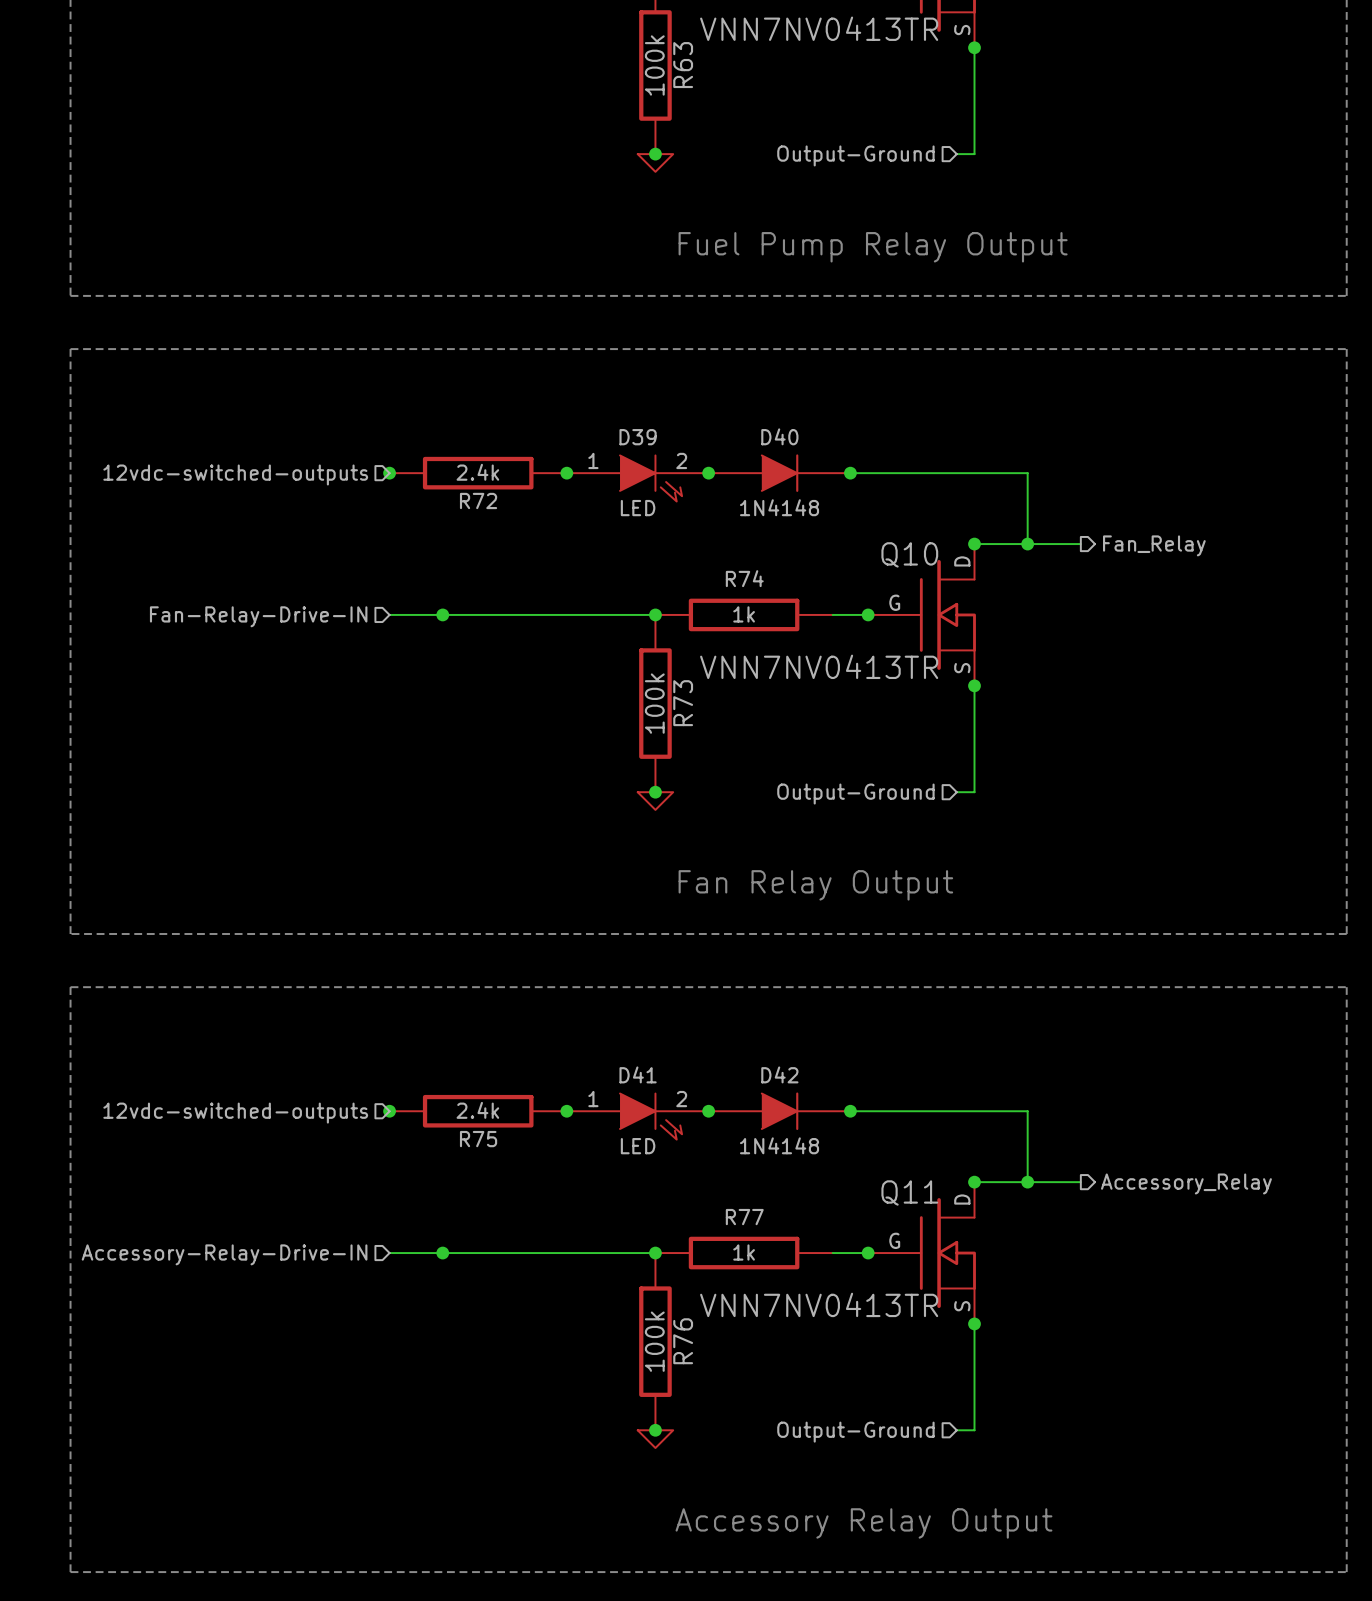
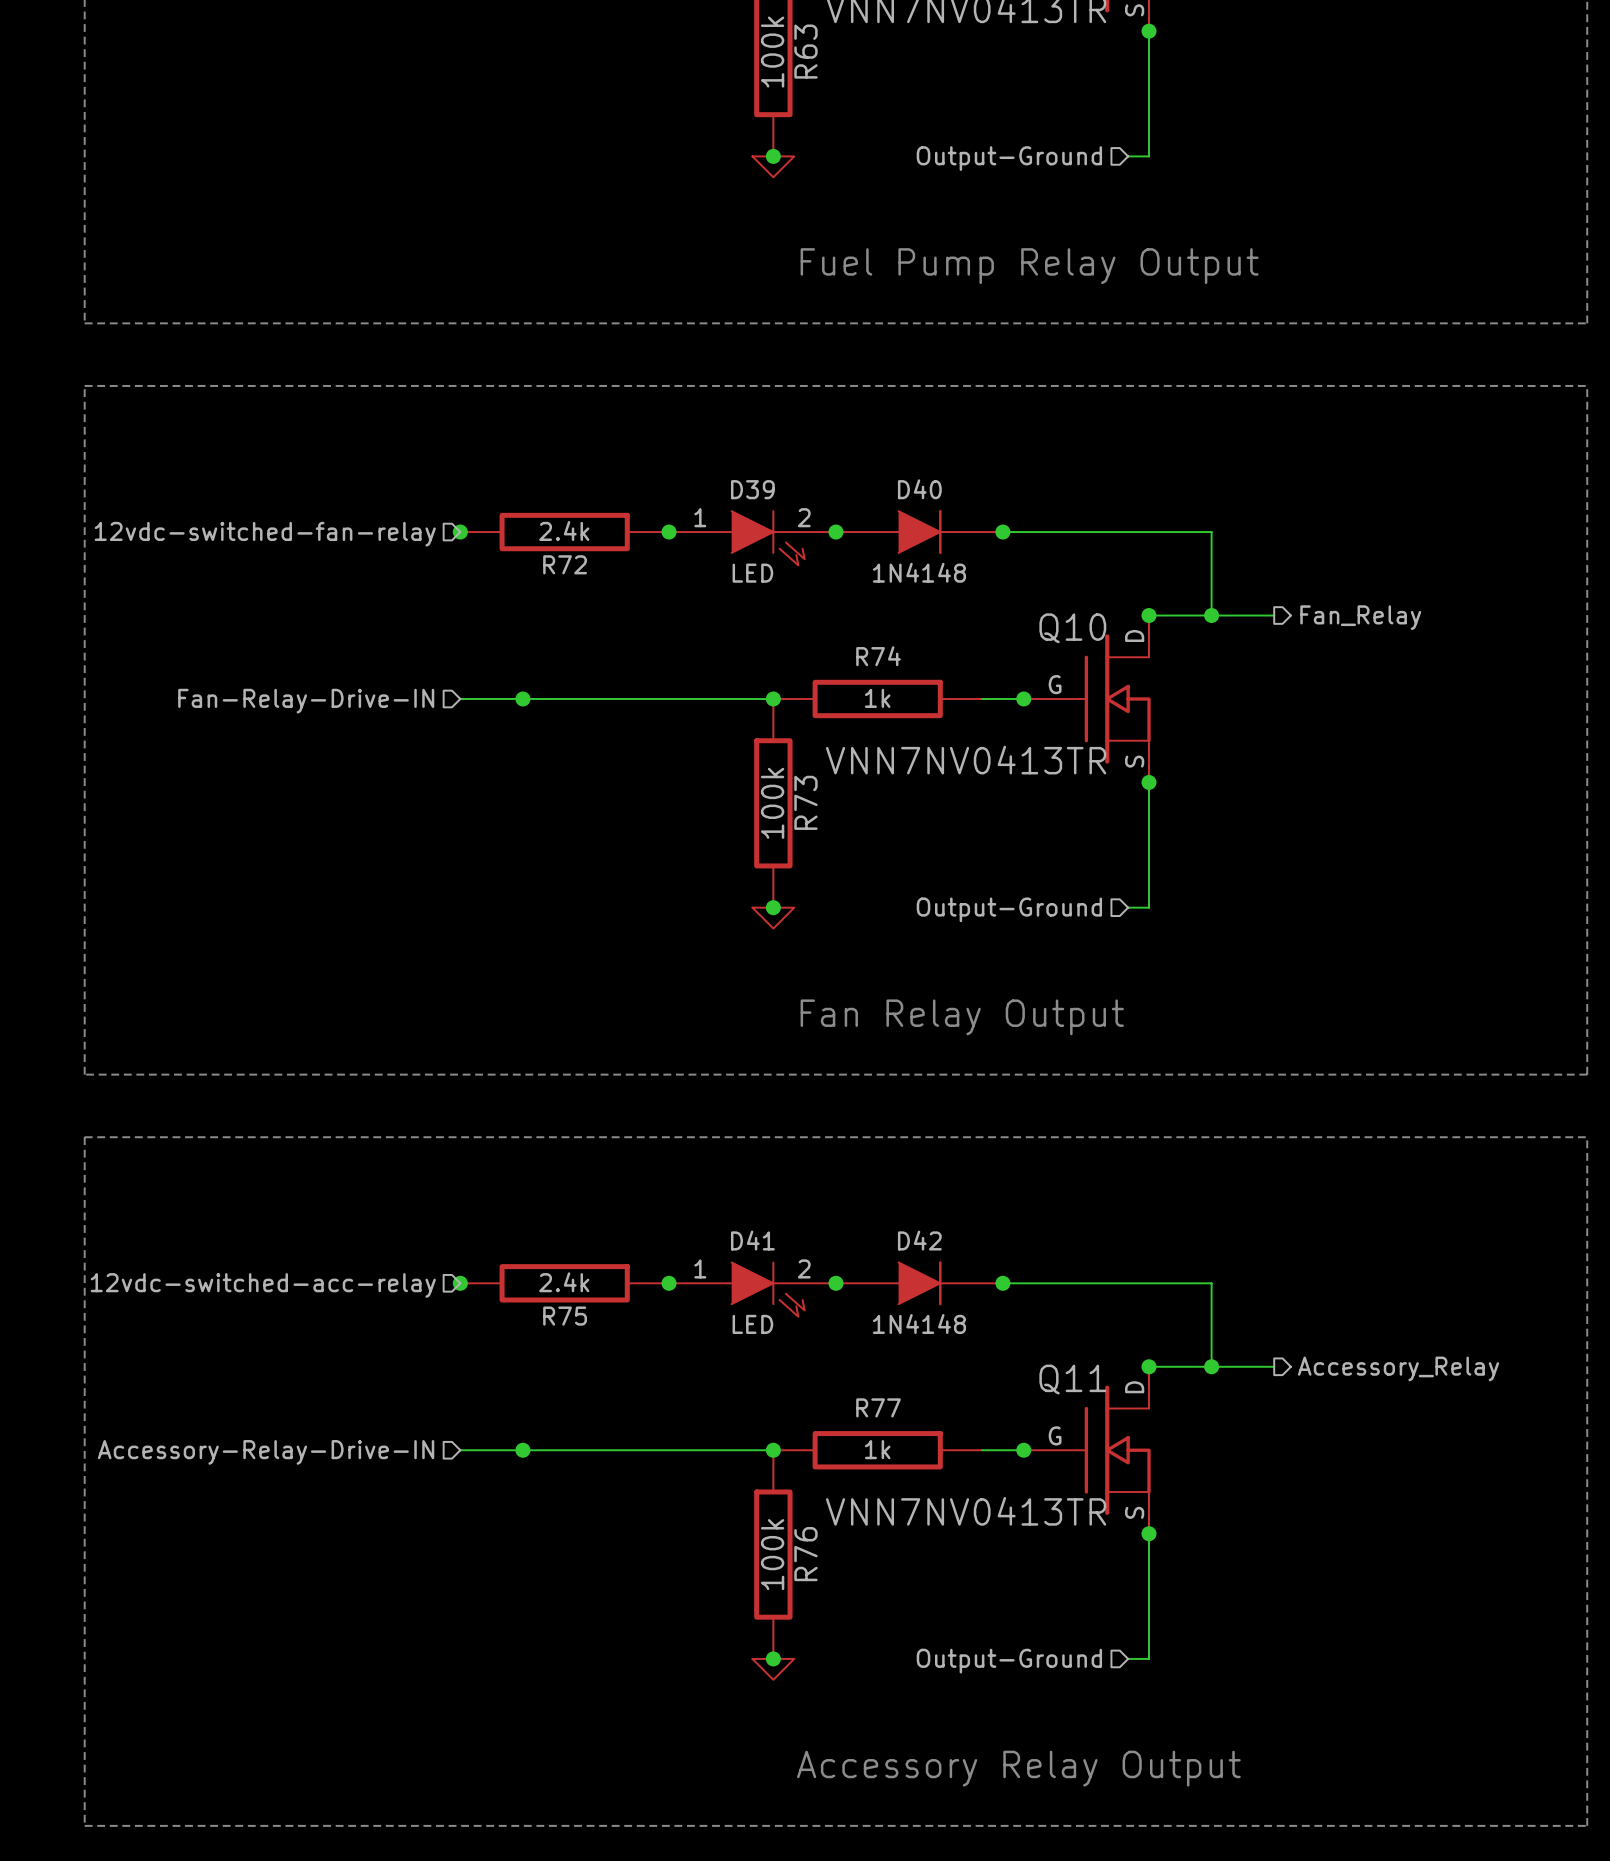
hierarchical label: 12vdc-switched-outputs (235, 474) -> 12vdc-switched-fan-relay (265, 534)
hierarchical label: 12vdc-switched-outputs (235, 1113) -> 12vdc-switched-acc-relay (263, 1285)

